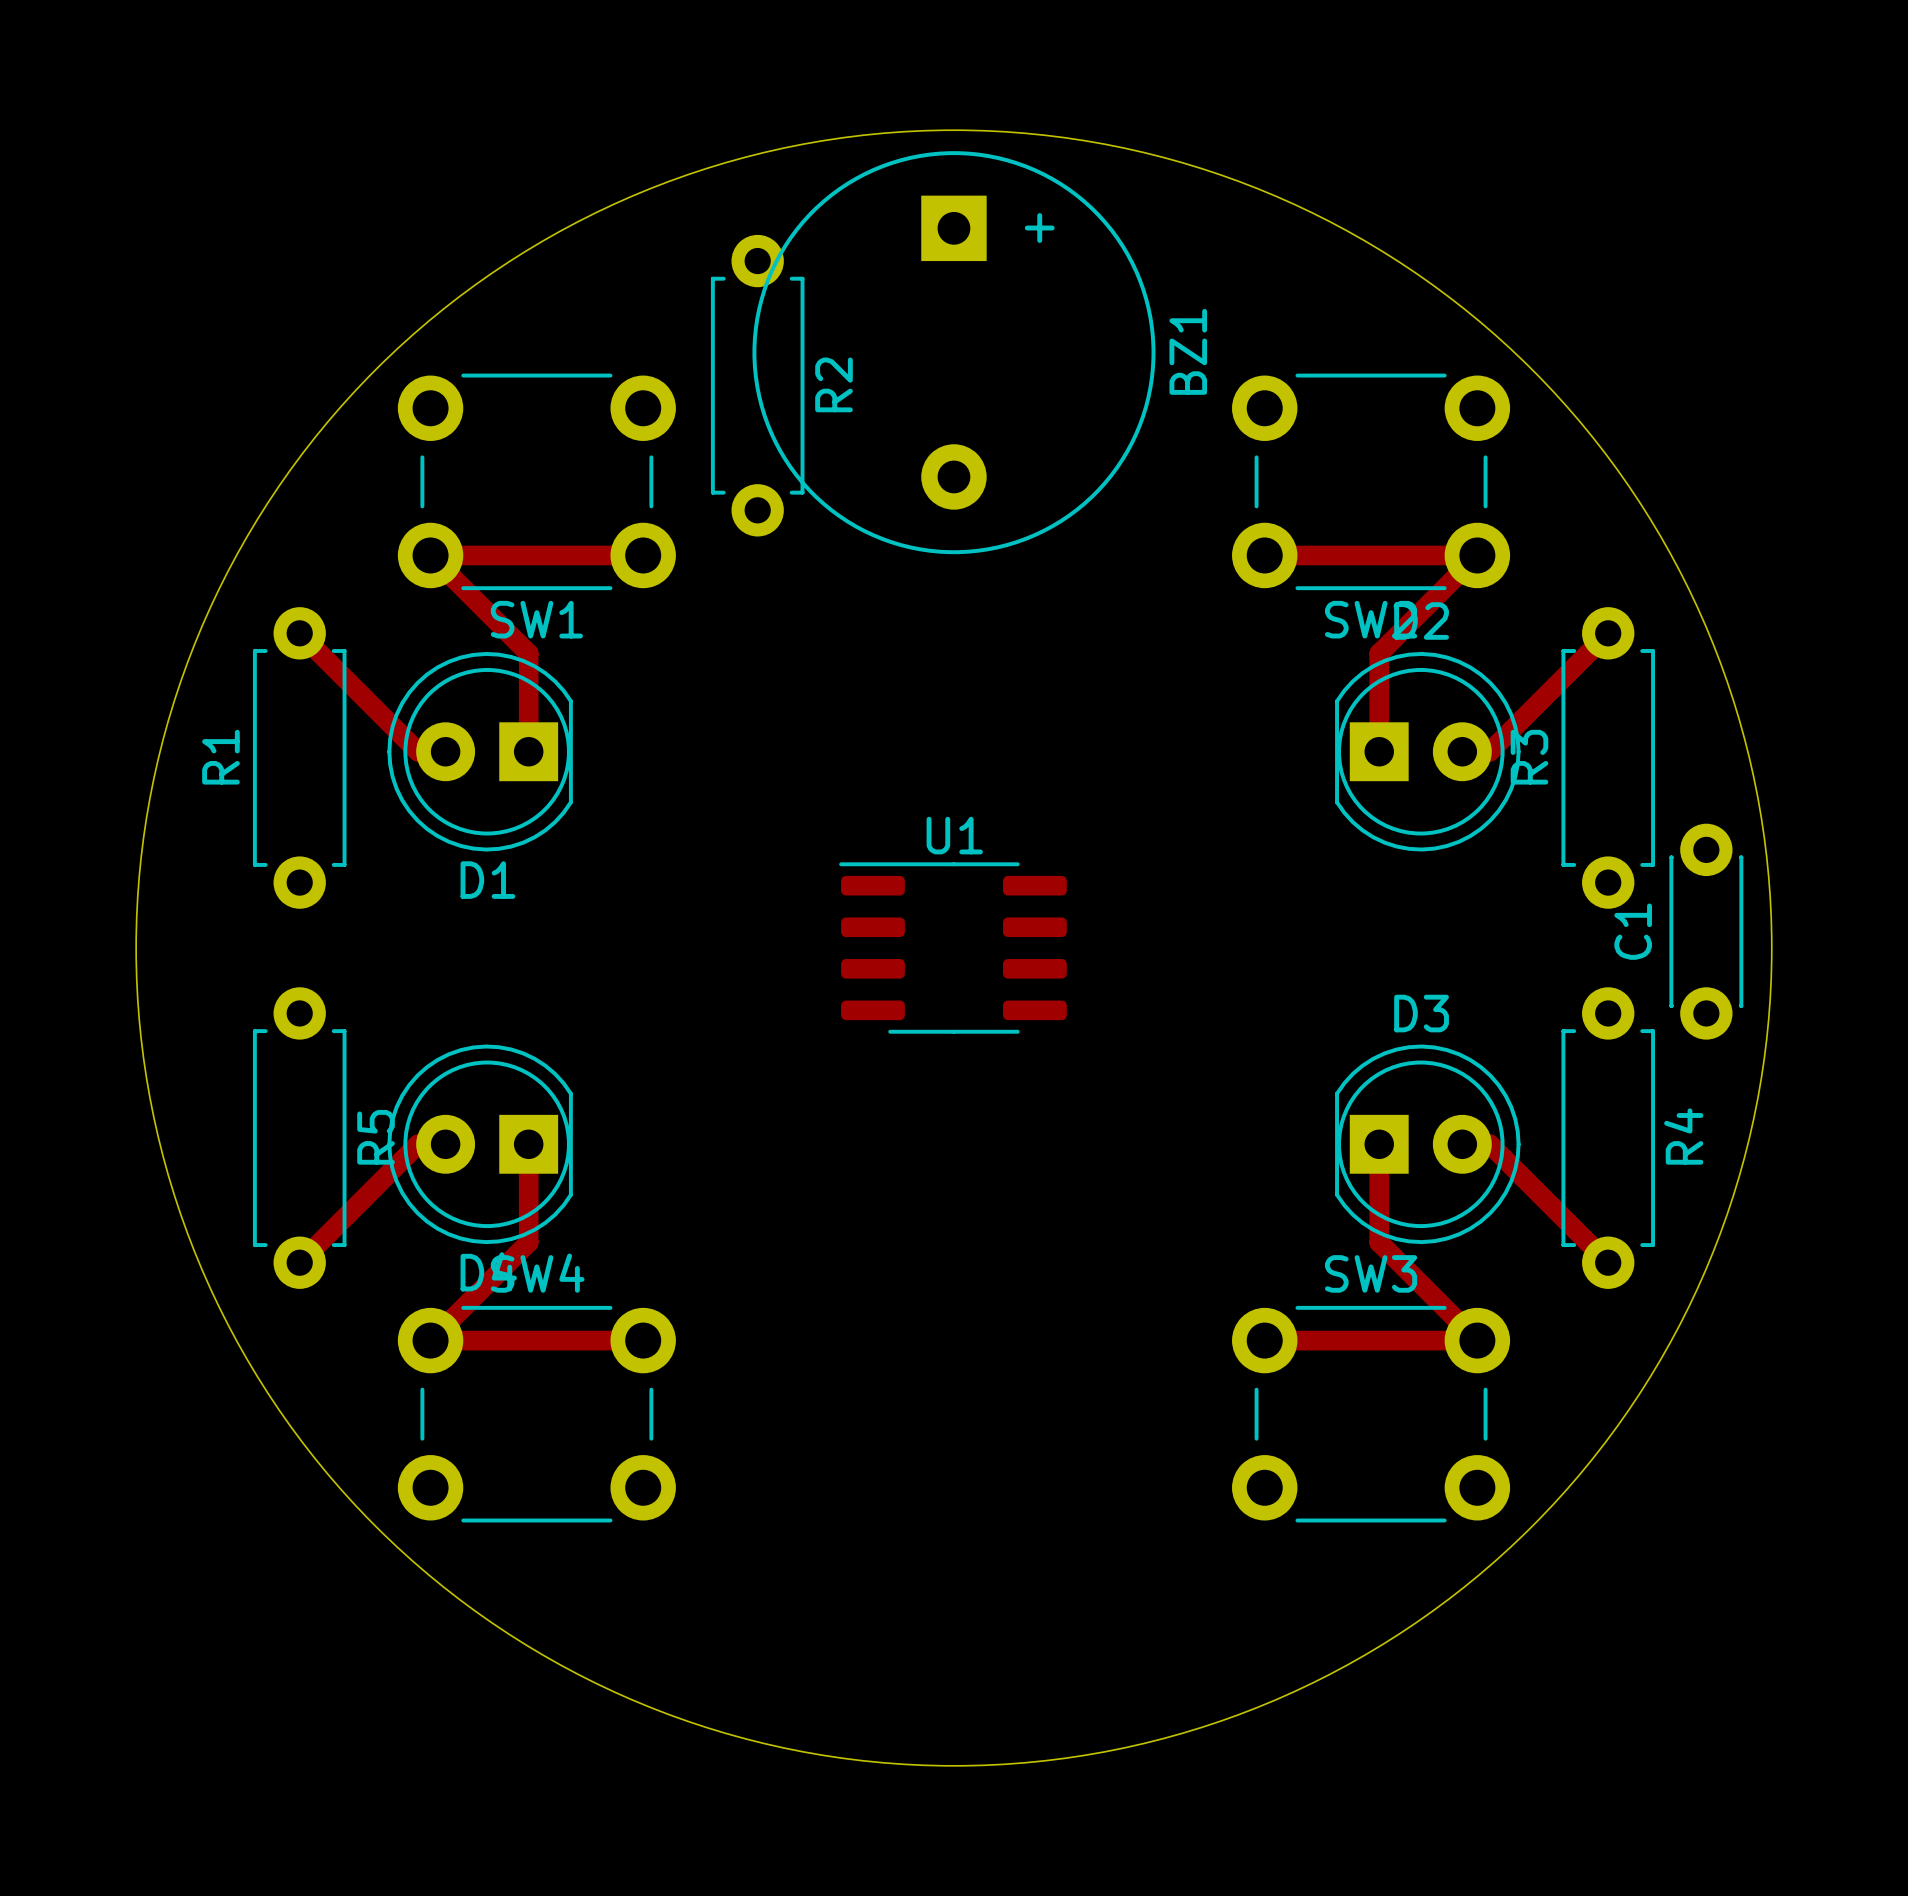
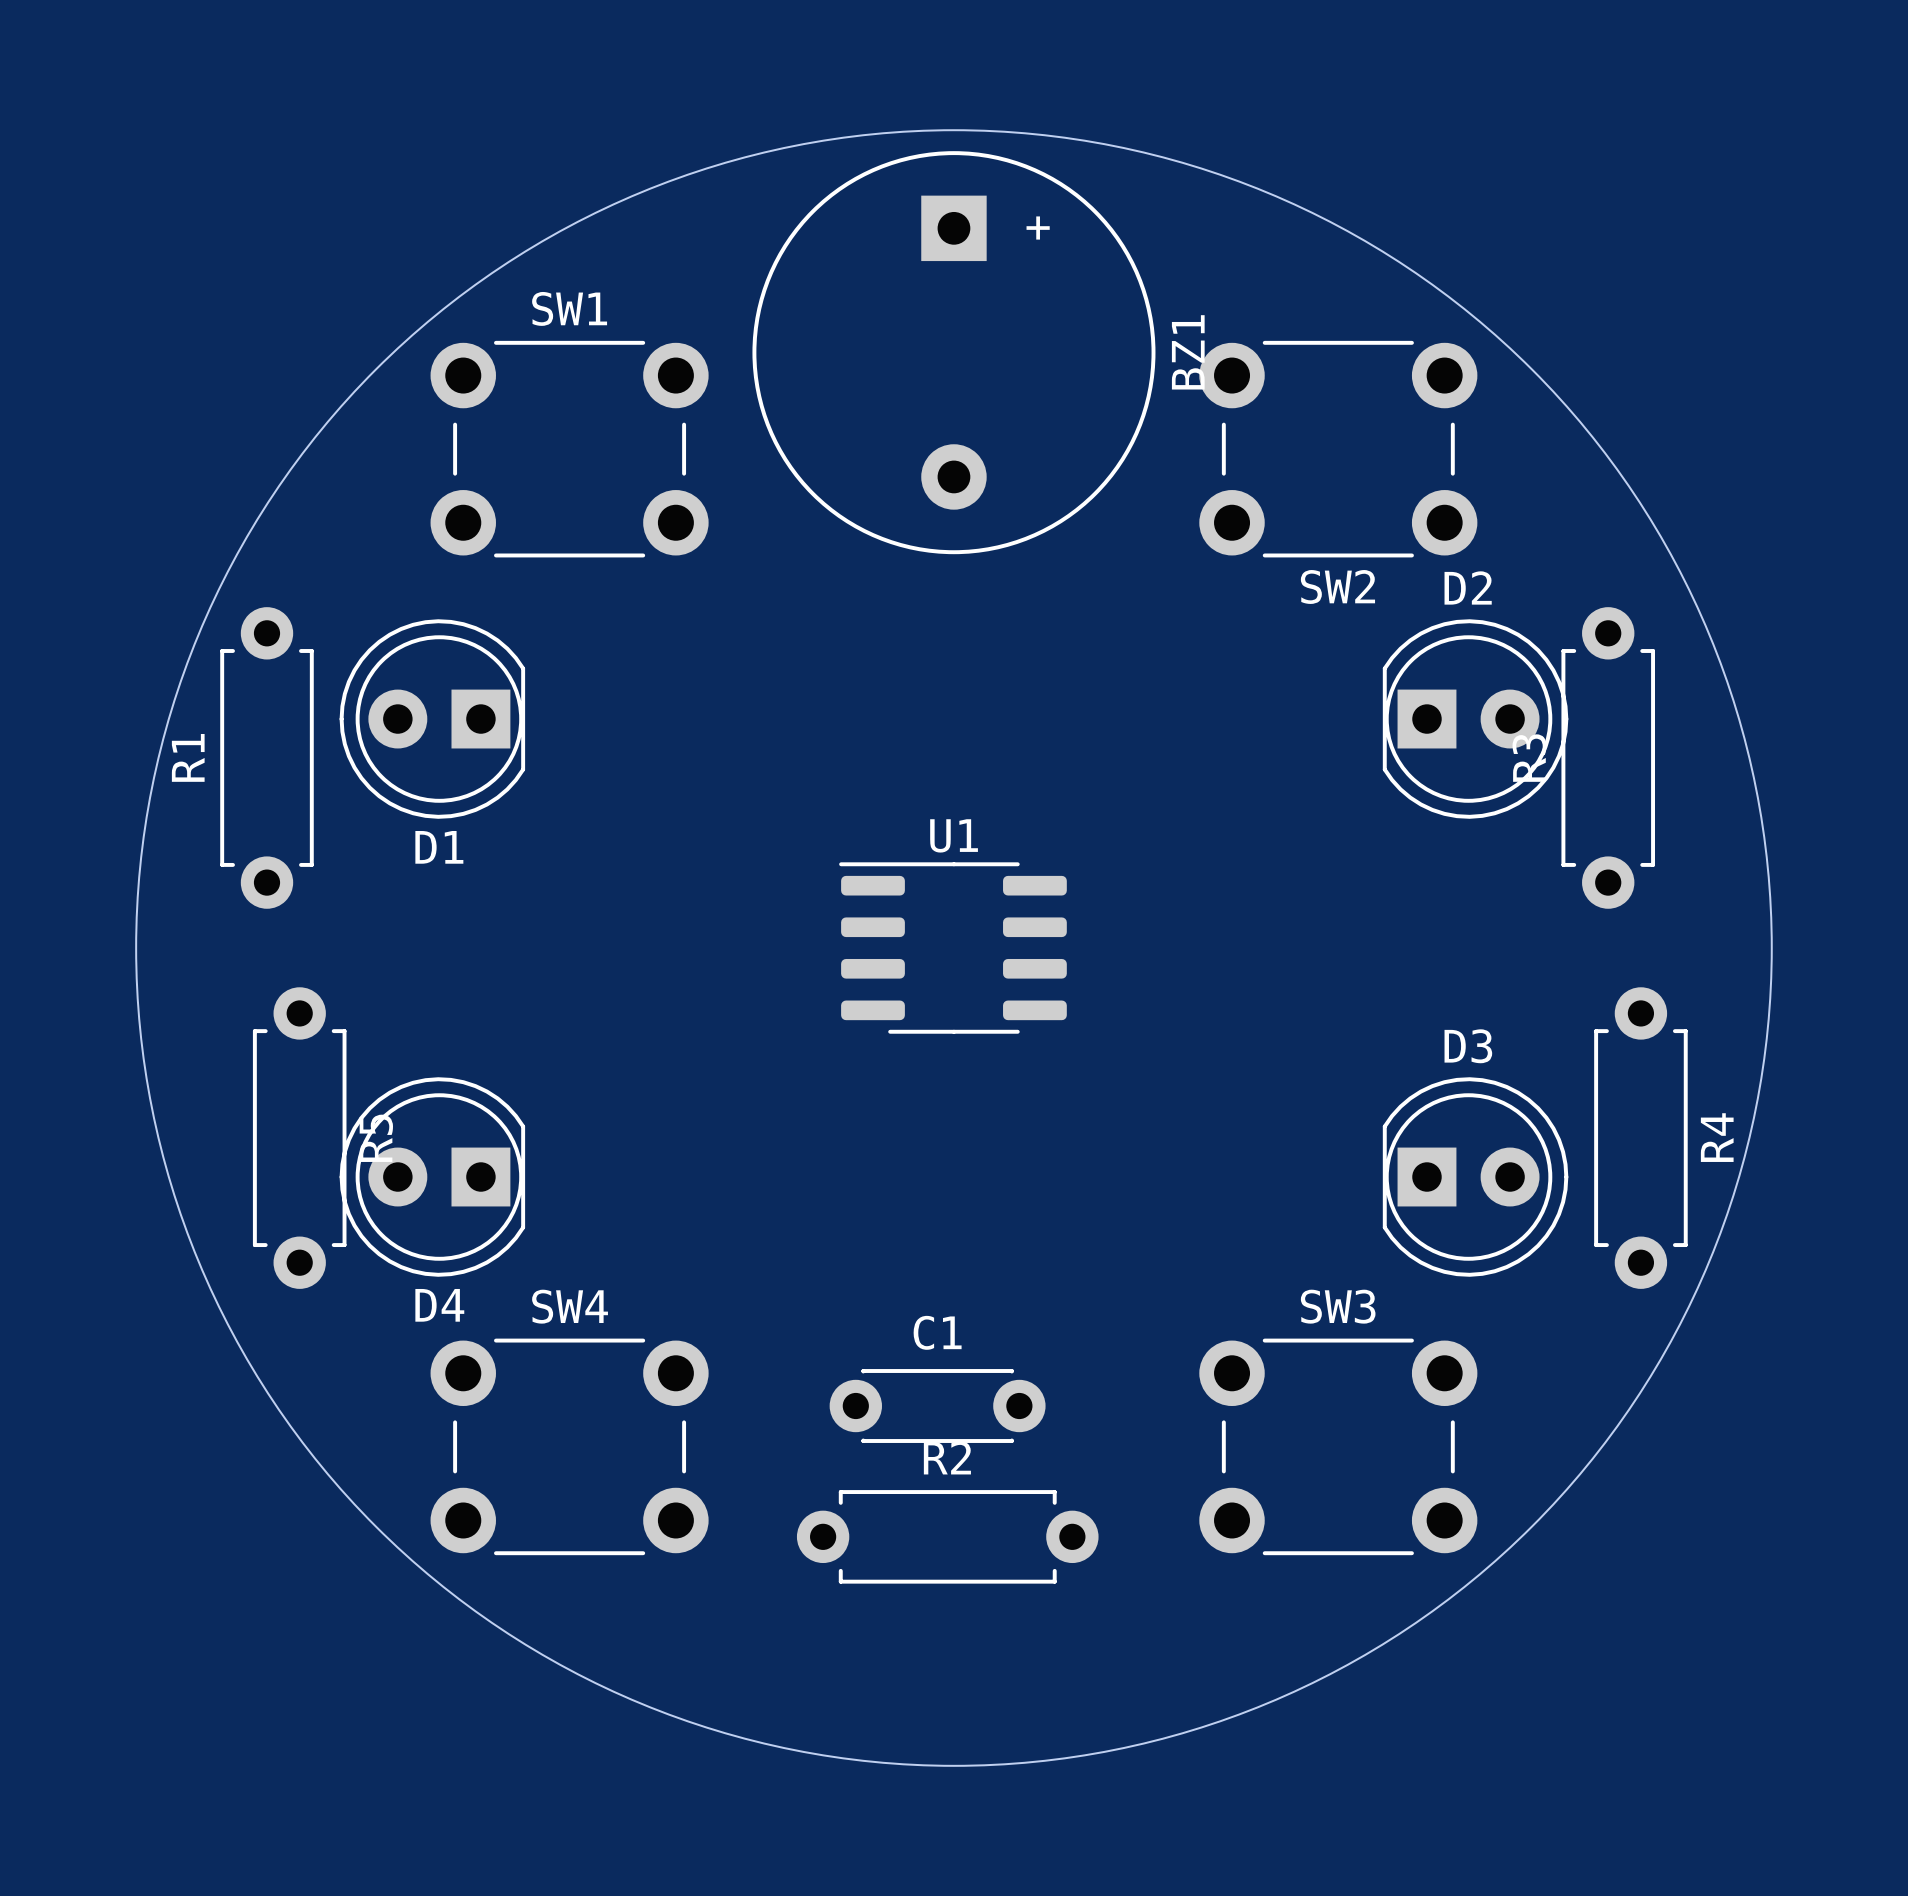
R2 name position: R2 (833, 384) -> R2 (947, 1457)
R2 rotation: 0° (757, 385) -> 90° clockwise (947, 1536)
R2 position: (757, 385) -> (947, 1536)
SW1 position: (536, 481) -> (569, 449)
SW2 position: (1371, 481) -> (1338, 449)
track: (643, 555) (430, 555) (528, 653) (528, 751) -> none
track: (1264, 555) (1477, 555) (1379, 653) (1379, 751) -> none
SW1 name position: SW1 (536, 619) -> SW1 (569, 308)
track: (299, 633) (418, 751) (445, 751) -> none
track: (1608, 633) (1489, 751) (1462, 751) -> none
D1 position: (480, 751) -> (432, 719)
D2 position: (1427, 751) -> (1475, 719)
R1 position: (299, 757) -> (266, 757)
C1 rotation: 0° (1706, 931) -> 90° clockwise (937, 1406)
C1 position: (1706, 931) -> (937, 1406)
R4 position: (1608, 1138) -> (1640, 1138)
track: (445, 1144) (418, 1144) (299, 1262) -> none
D4 position: (480, 1144) -> (432, 1177)
track: (528, 1144) (528, 1242) (430, 1340) (643, 1340) -> none
track: (1379, 1144) (1379, 1242) (1477, 1340) (1264, 1340) -> none
D3 position: (1427, 1144) -> (1475, 1177)
track: (1462, 1144) (1489, 1144) (1608, 1262) -> none
SW4 position: (536, 1414) -> (569, 1446)
SW3 position: (1371, 1414) -> (1338, 1446)

